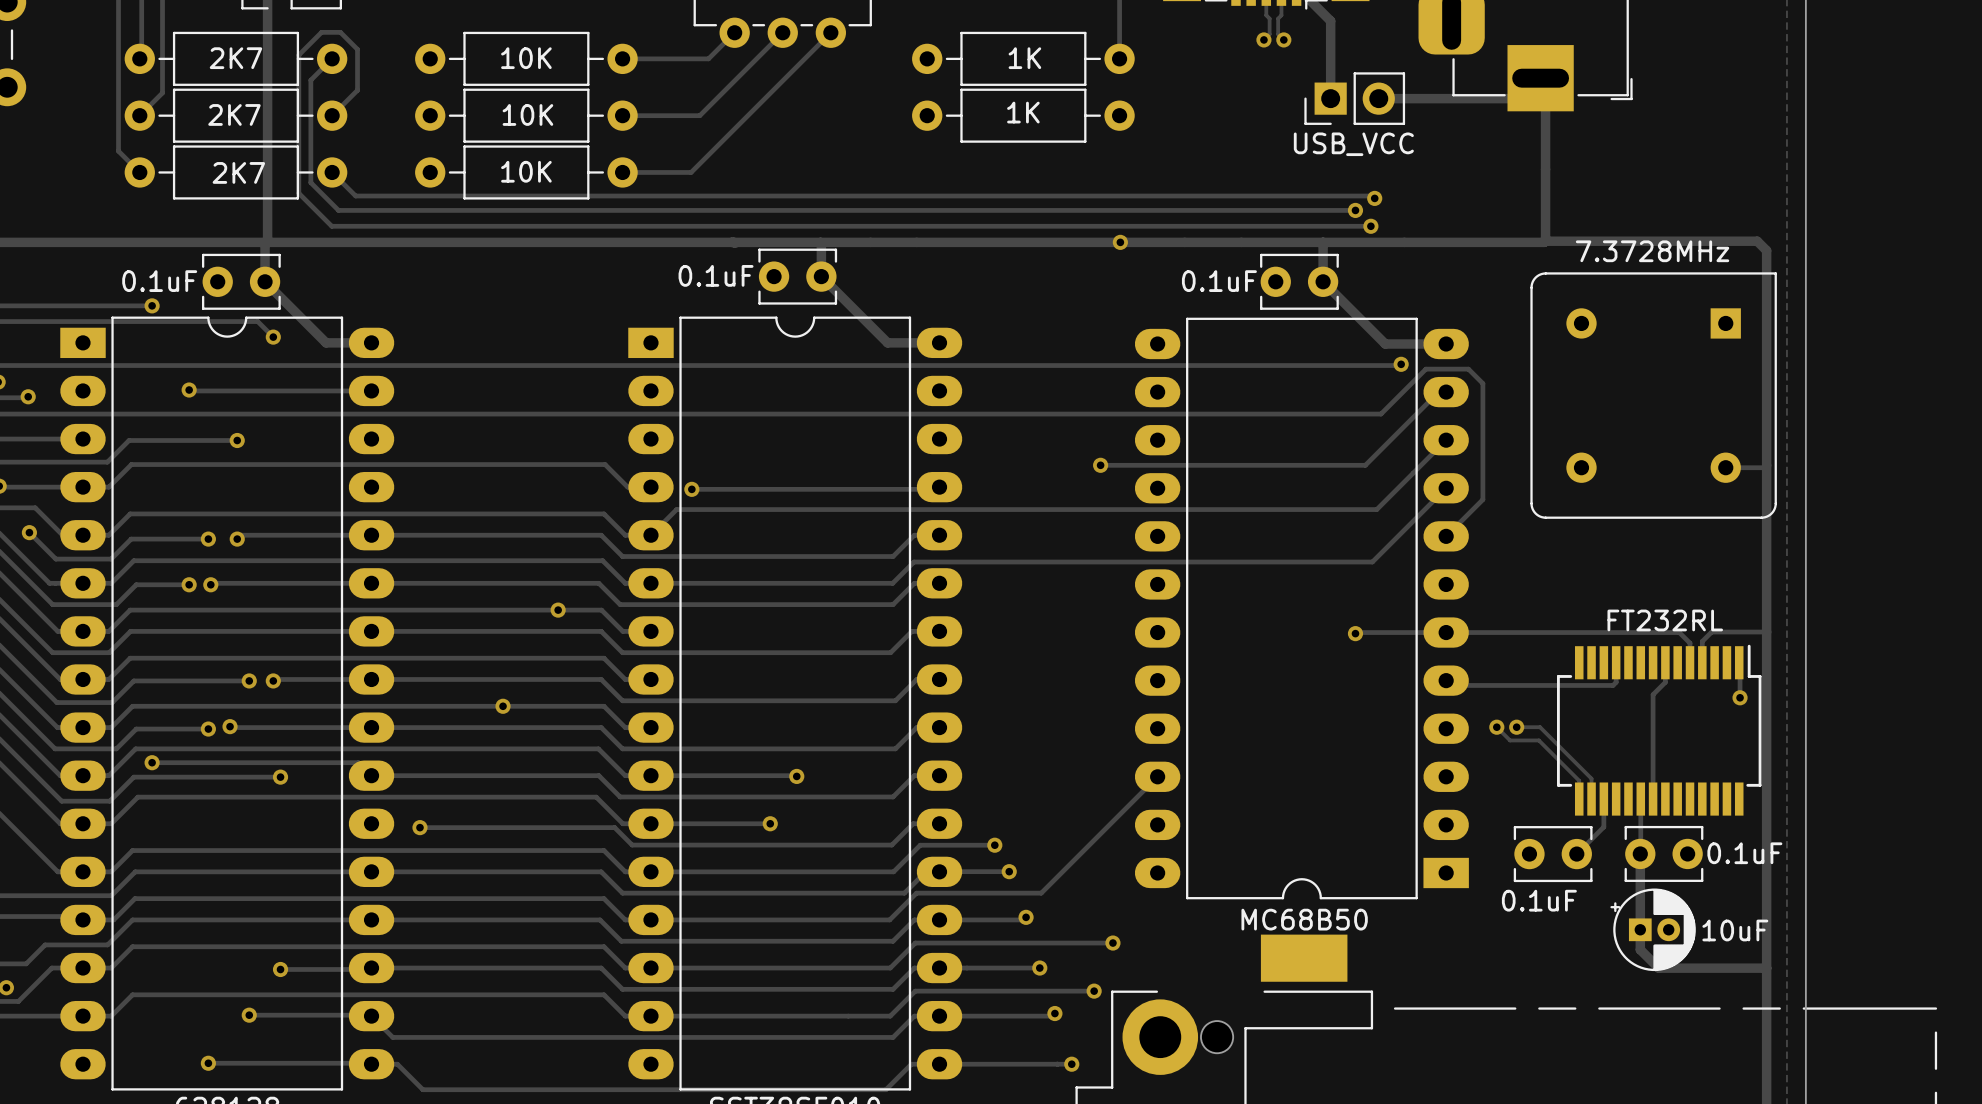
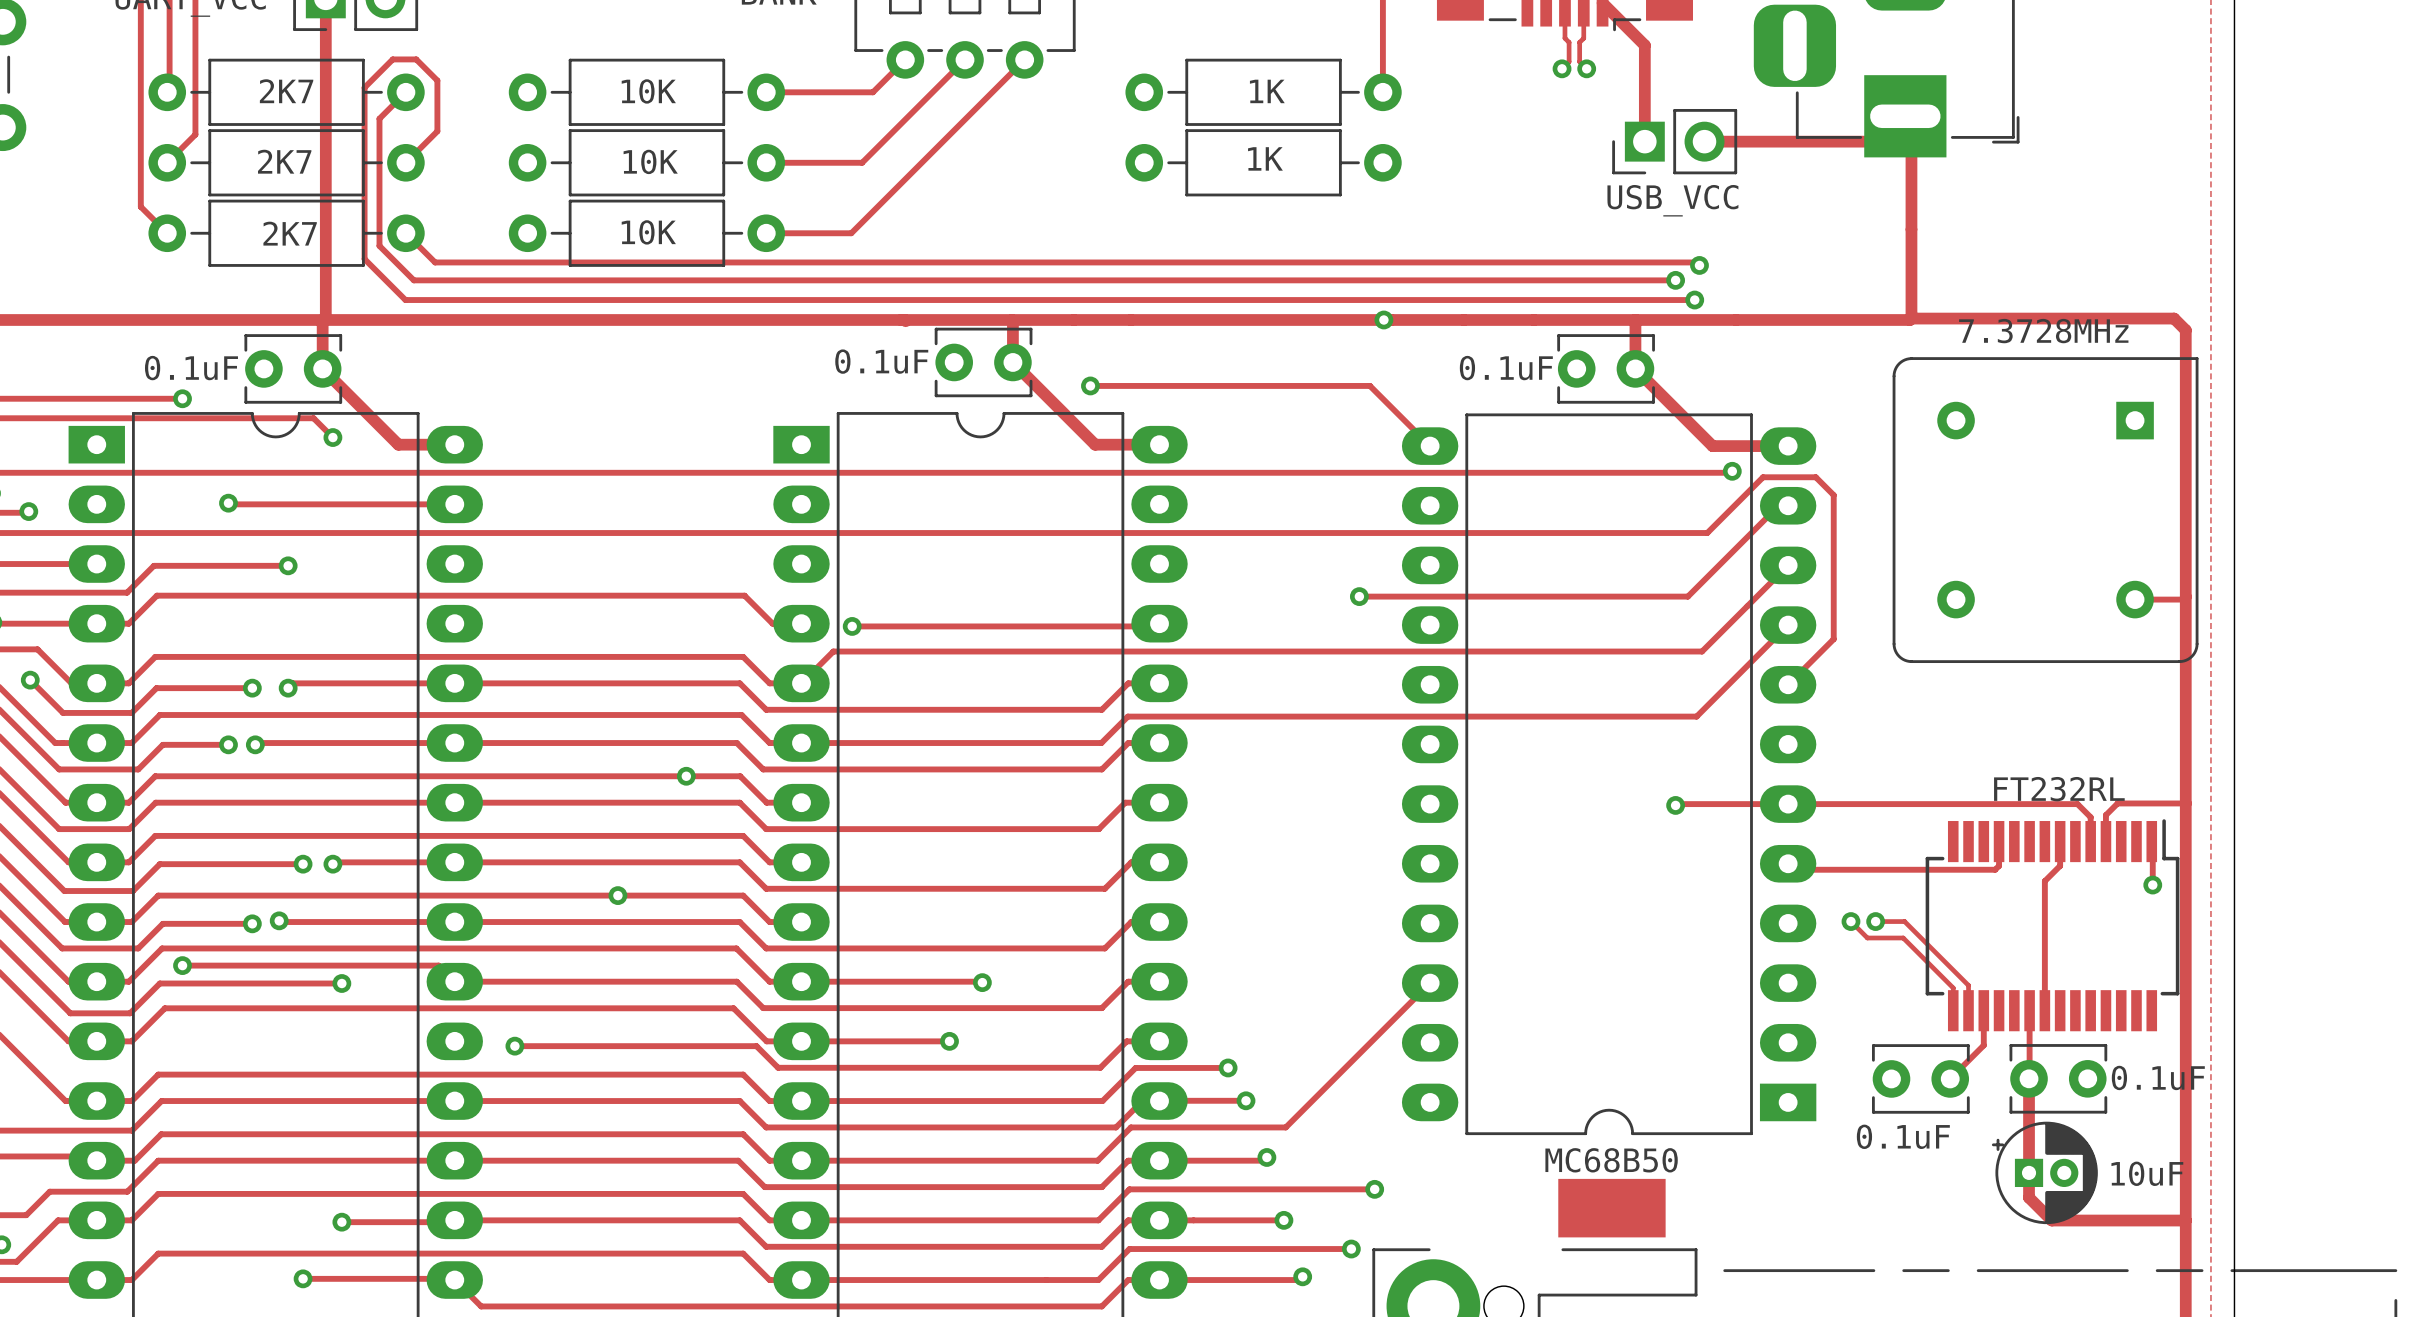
track: none -> (1090, 385) (1369, 385) (1430, 446)
via: none -> (1090, 385)

